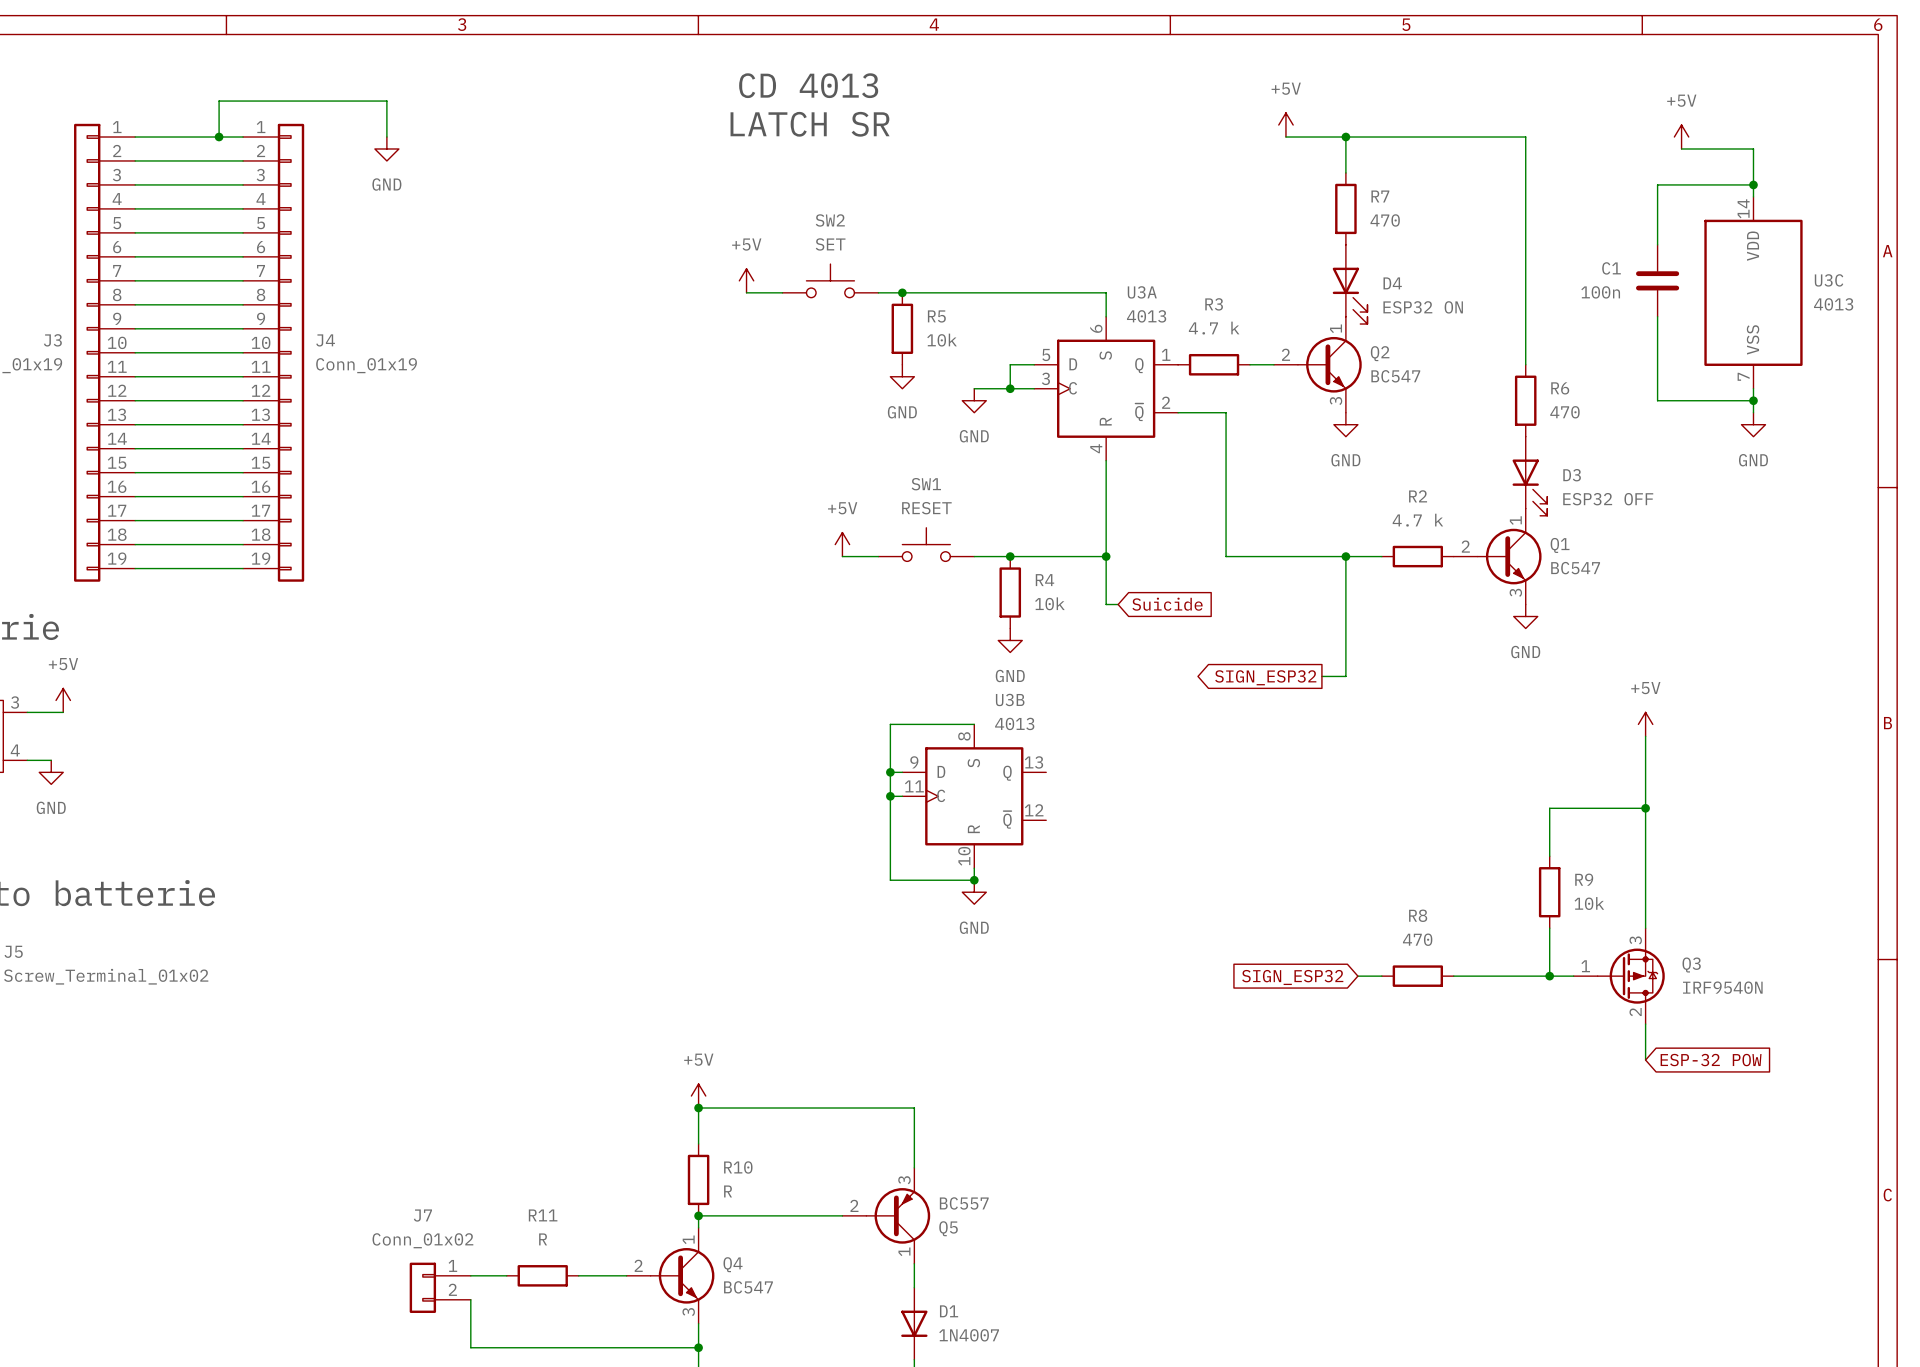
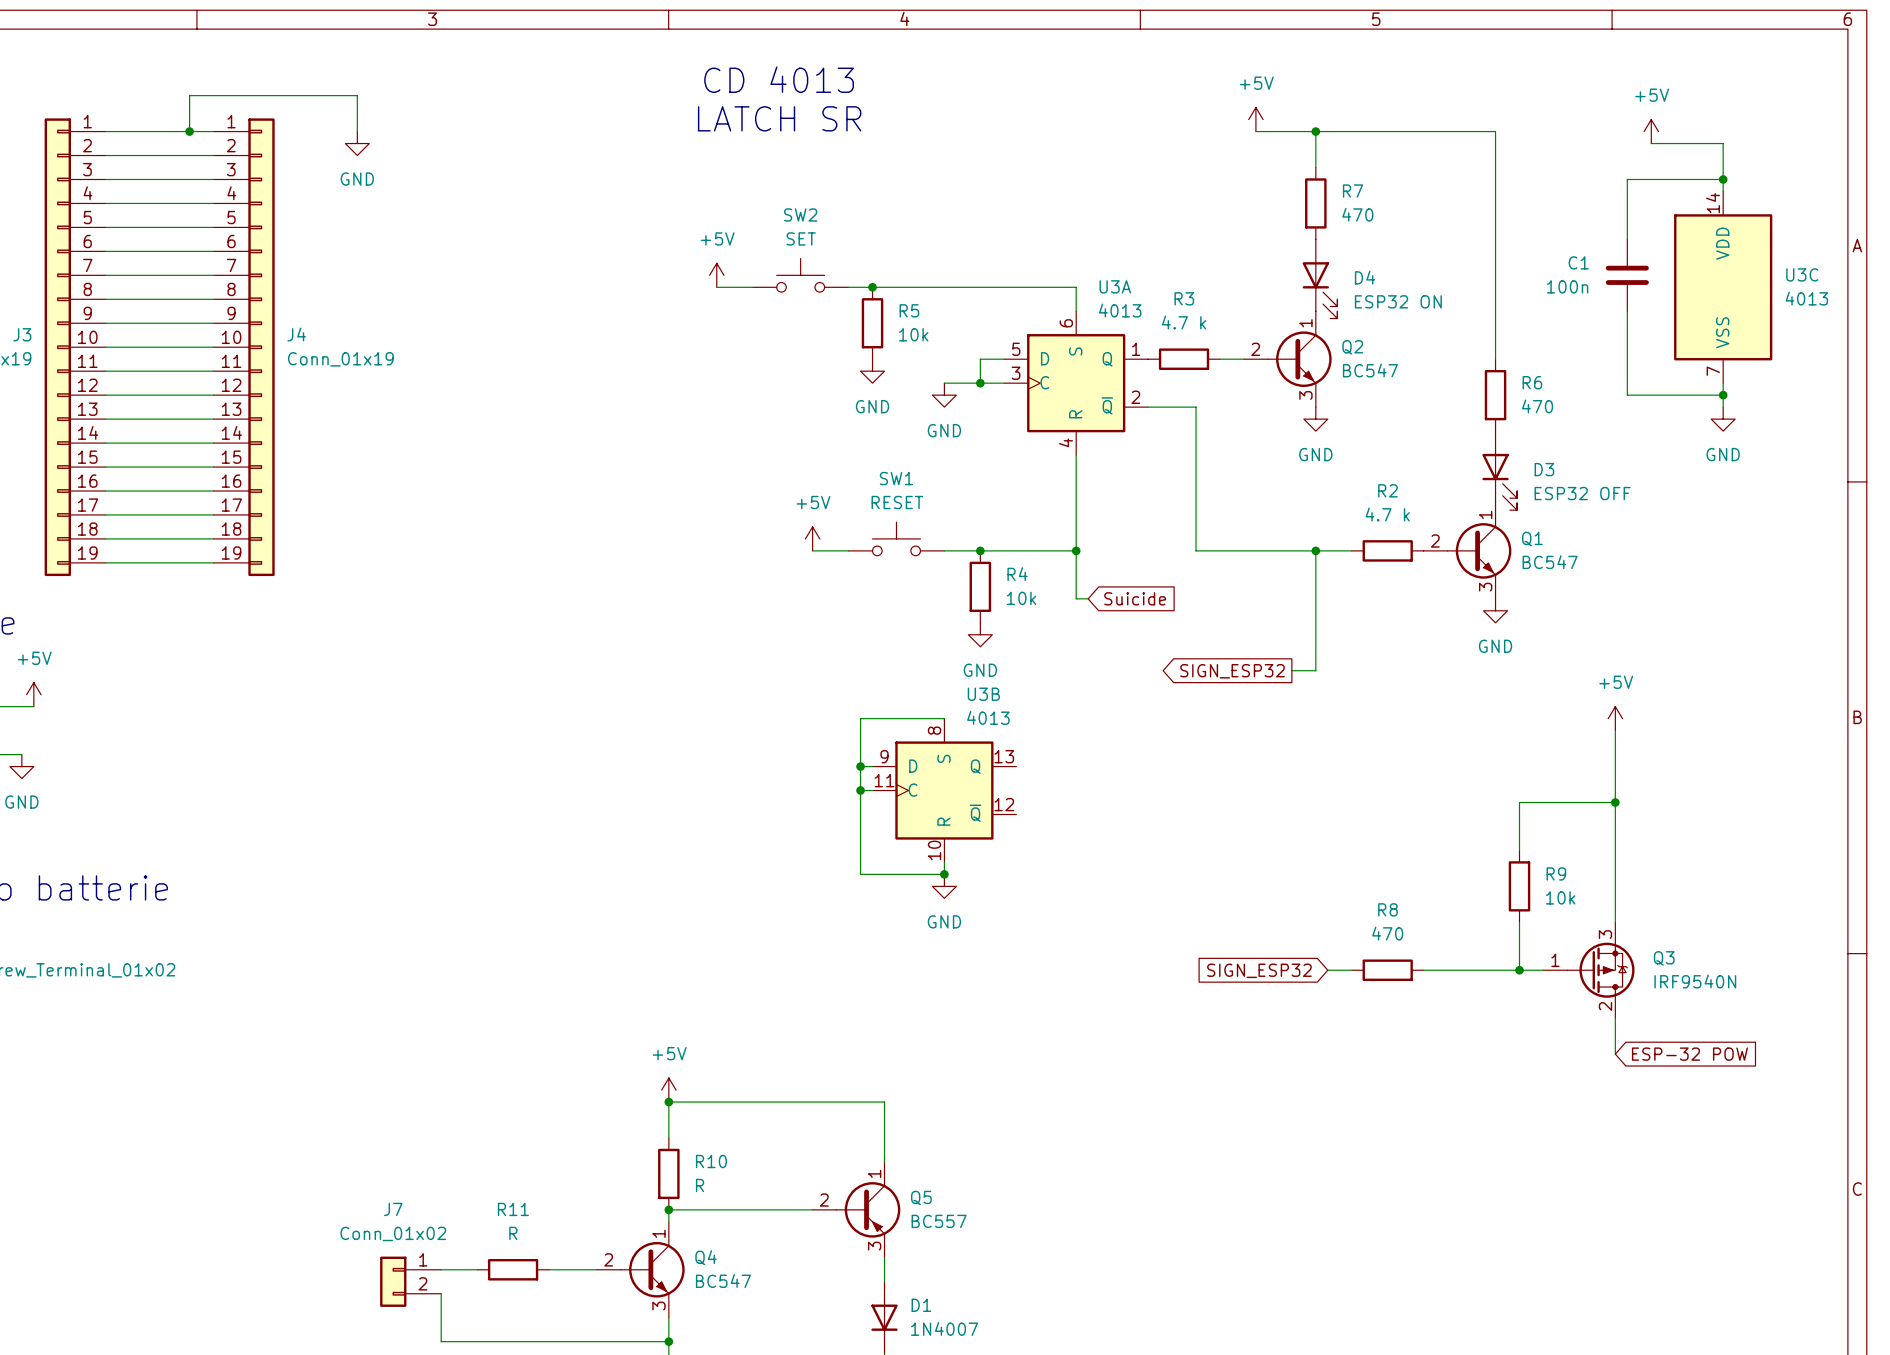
Q5 flip: as is (898, 1215) -> up-down (868, 1209)

